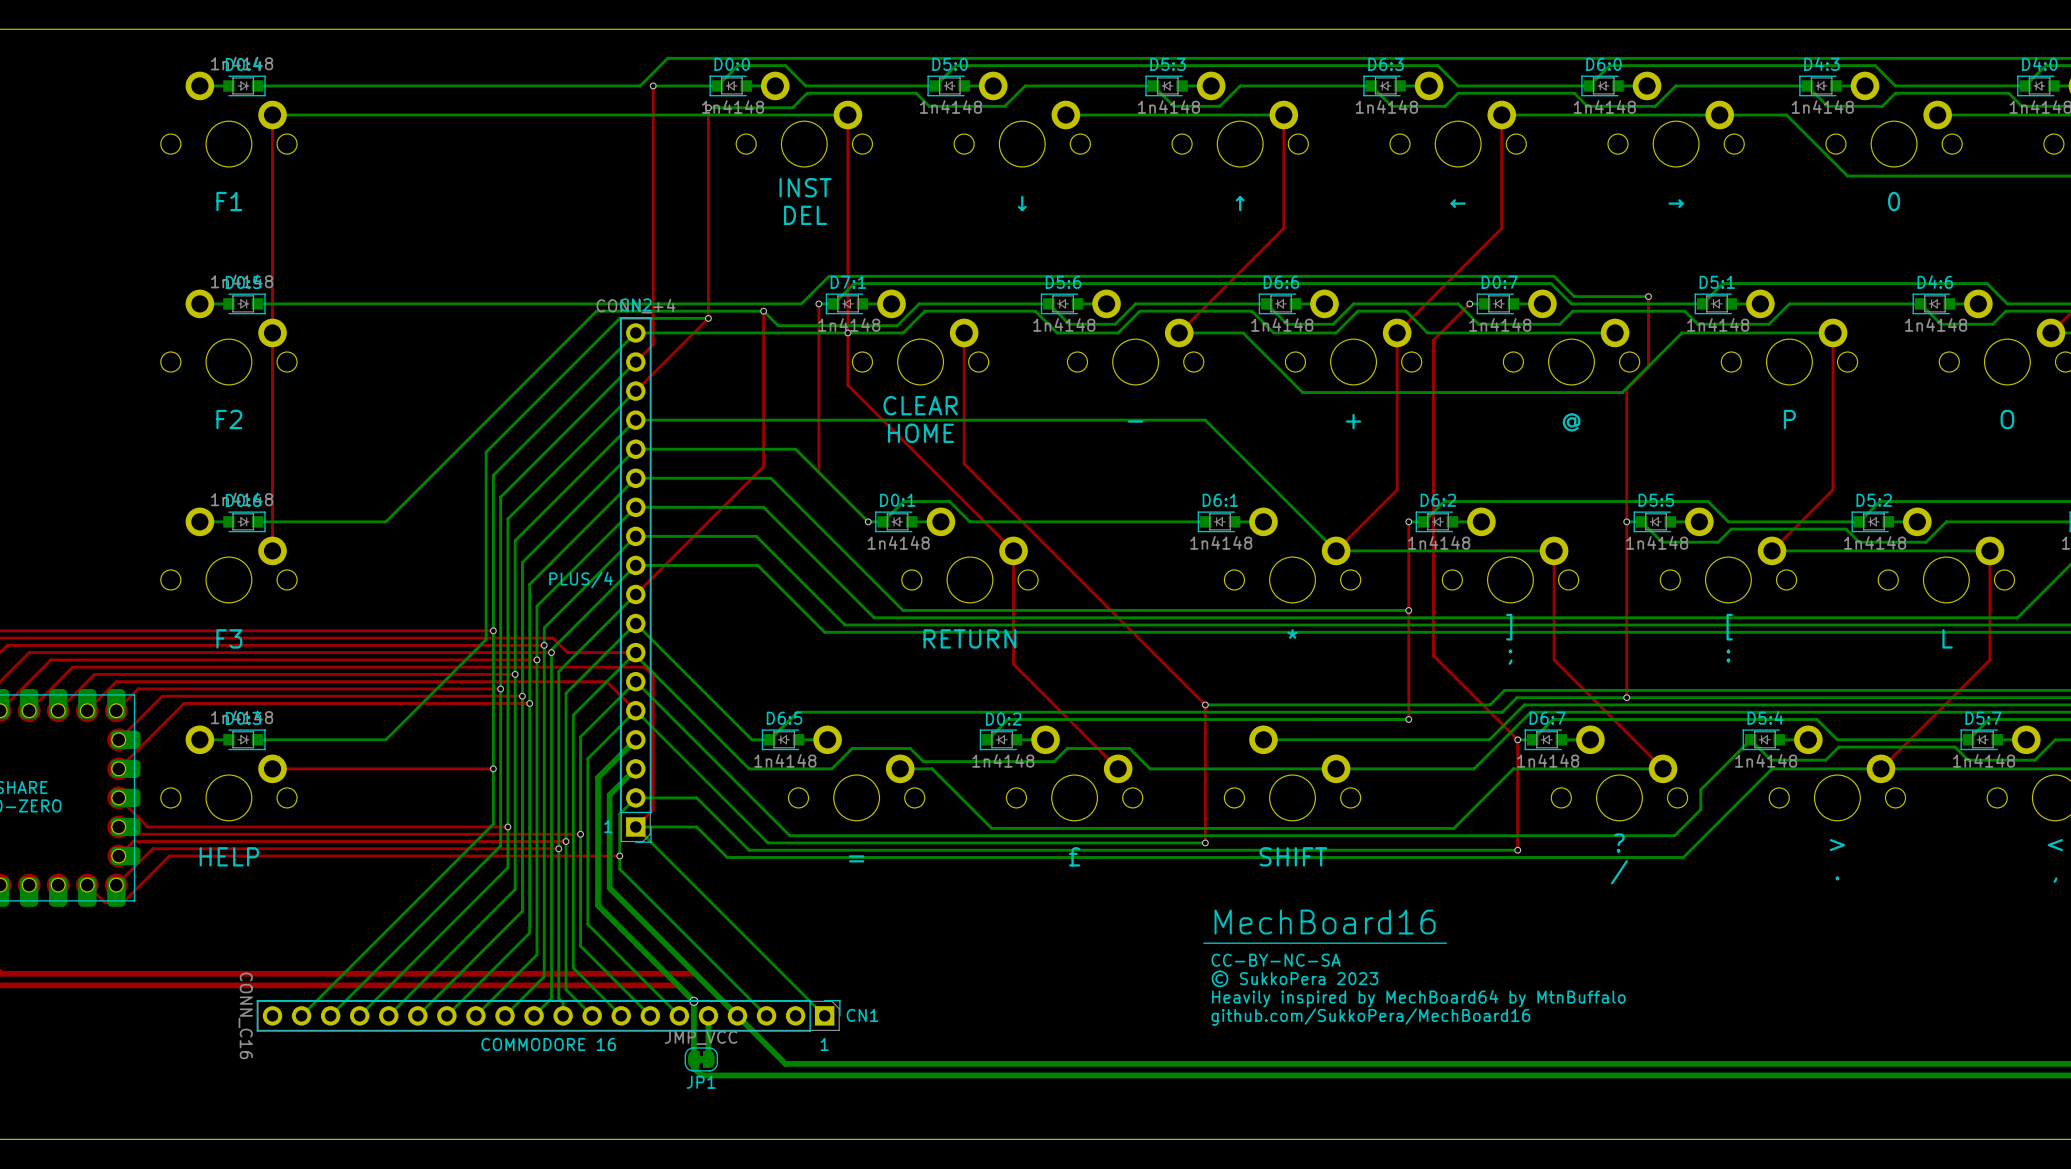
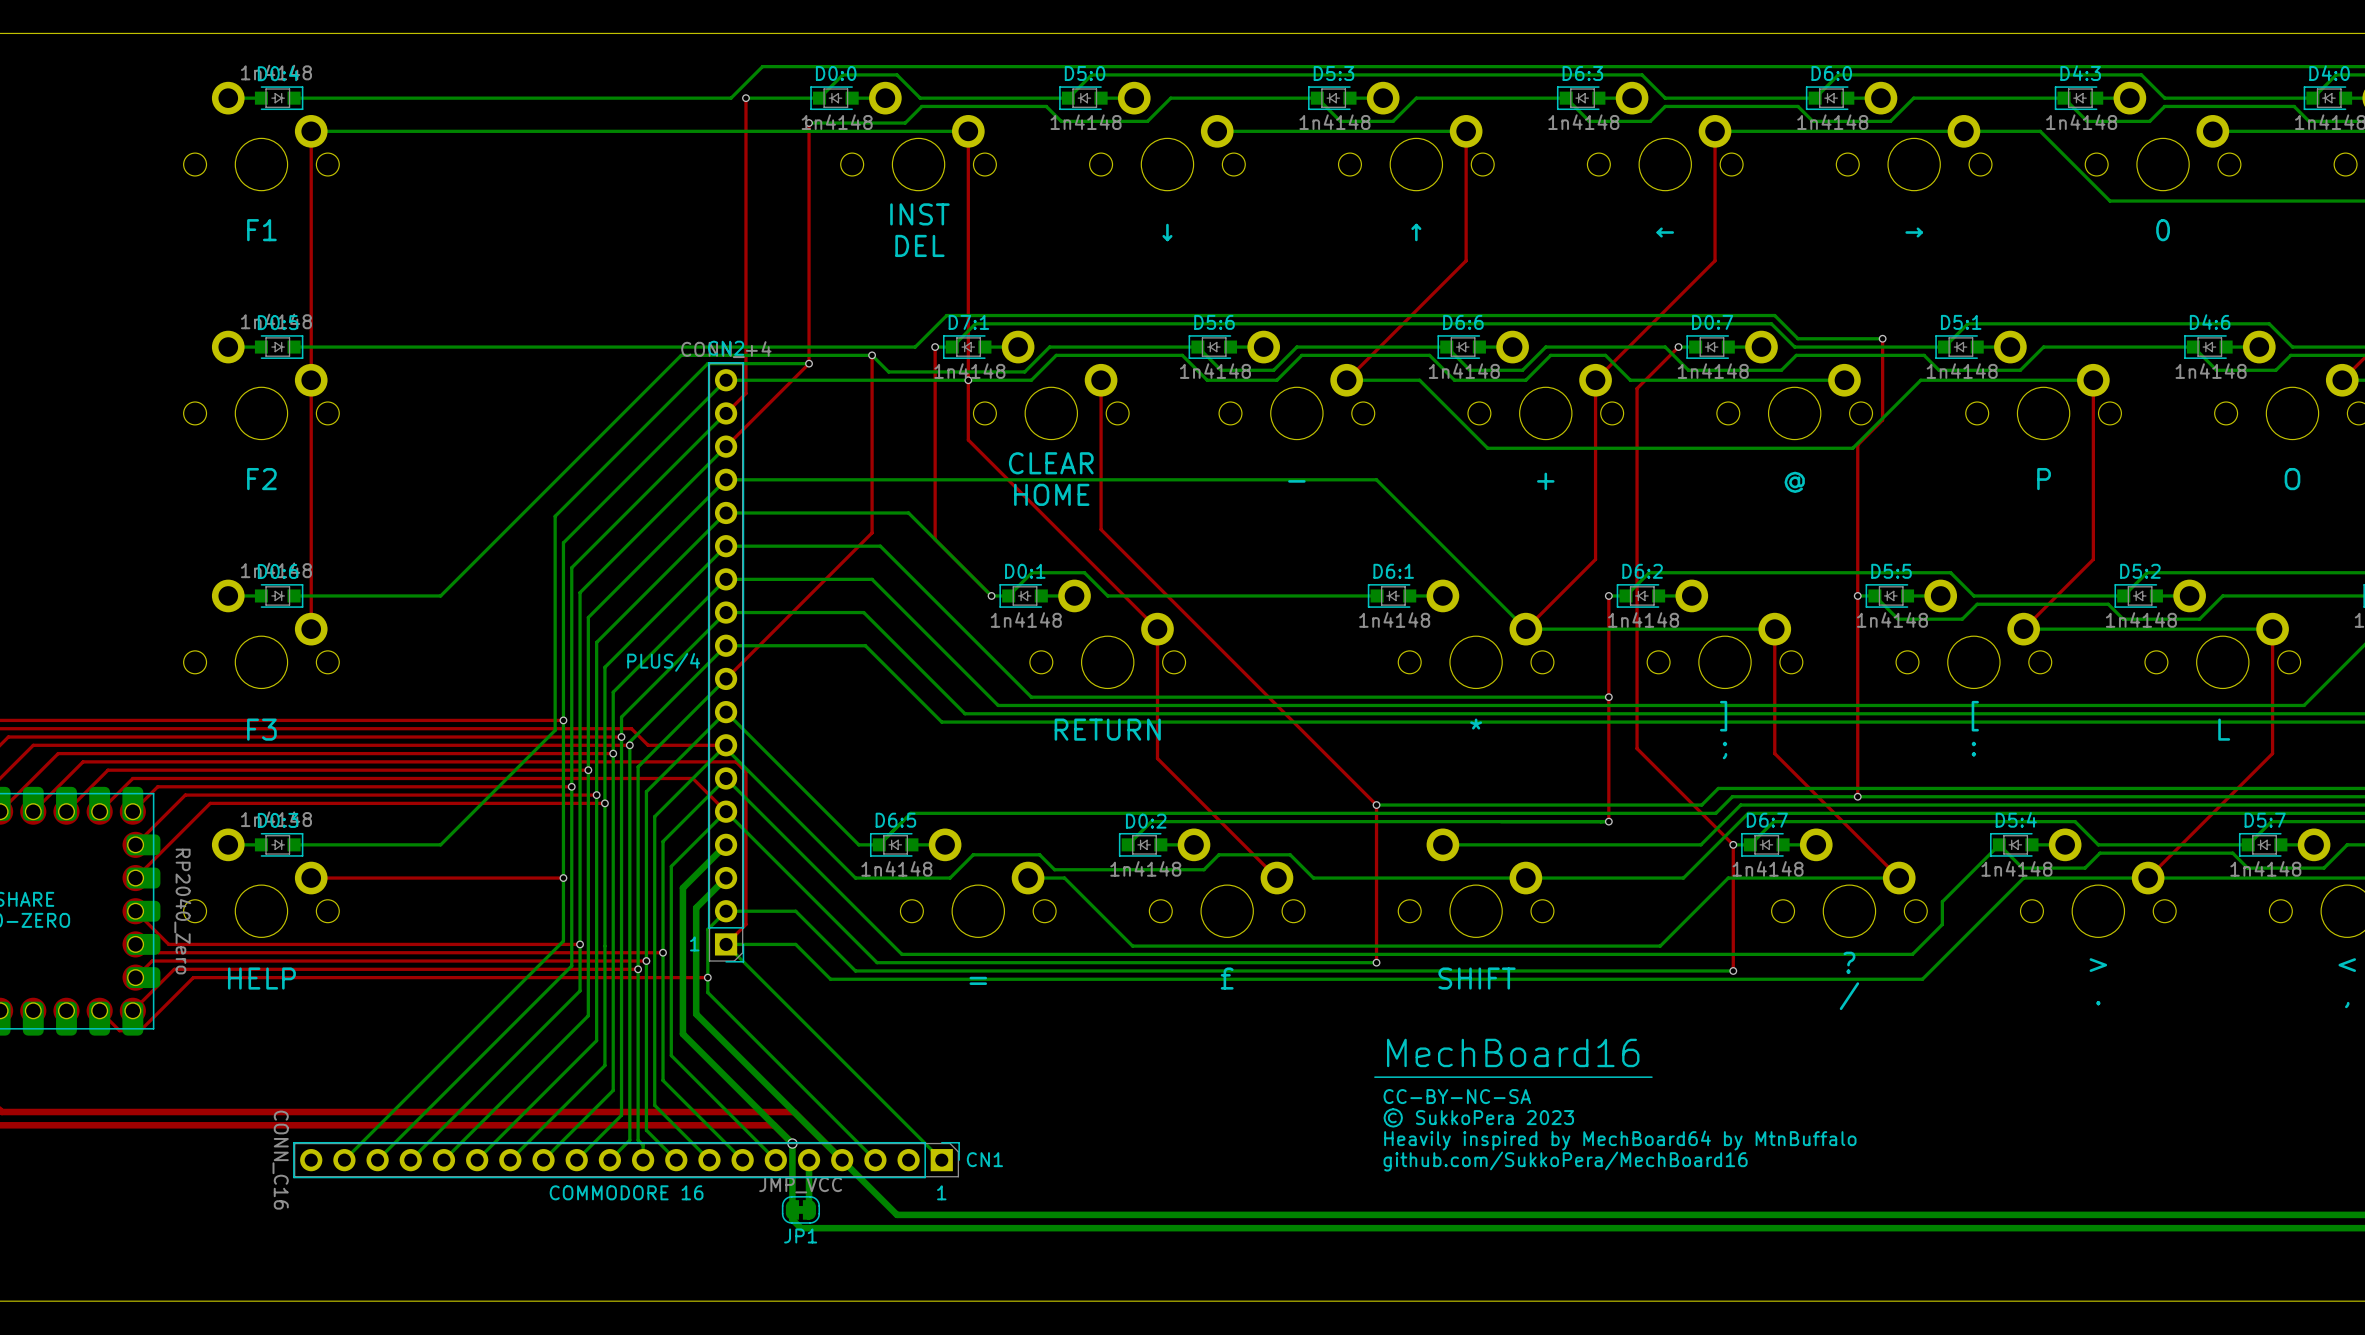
part value: none -> RP2040_Zero (182, 911)

